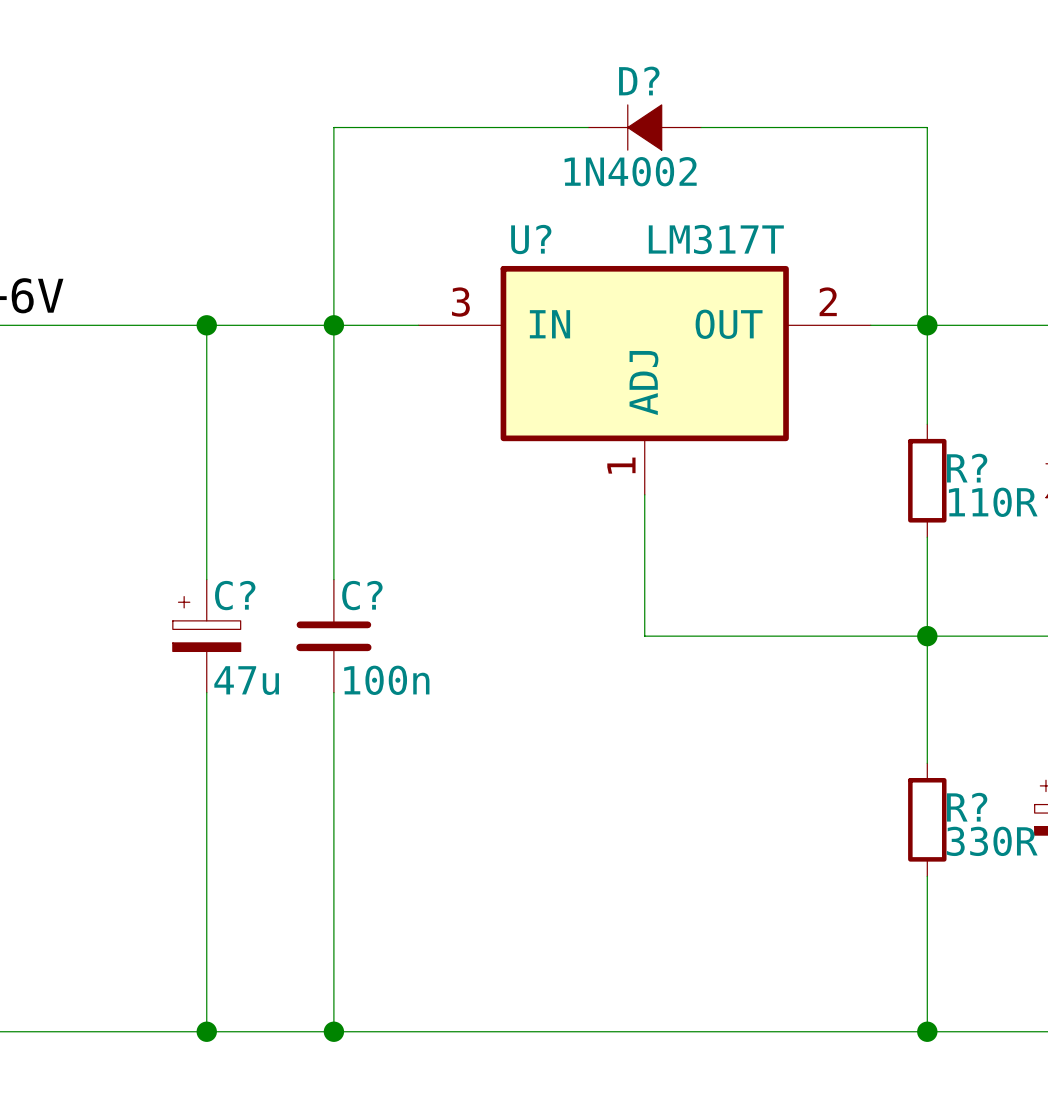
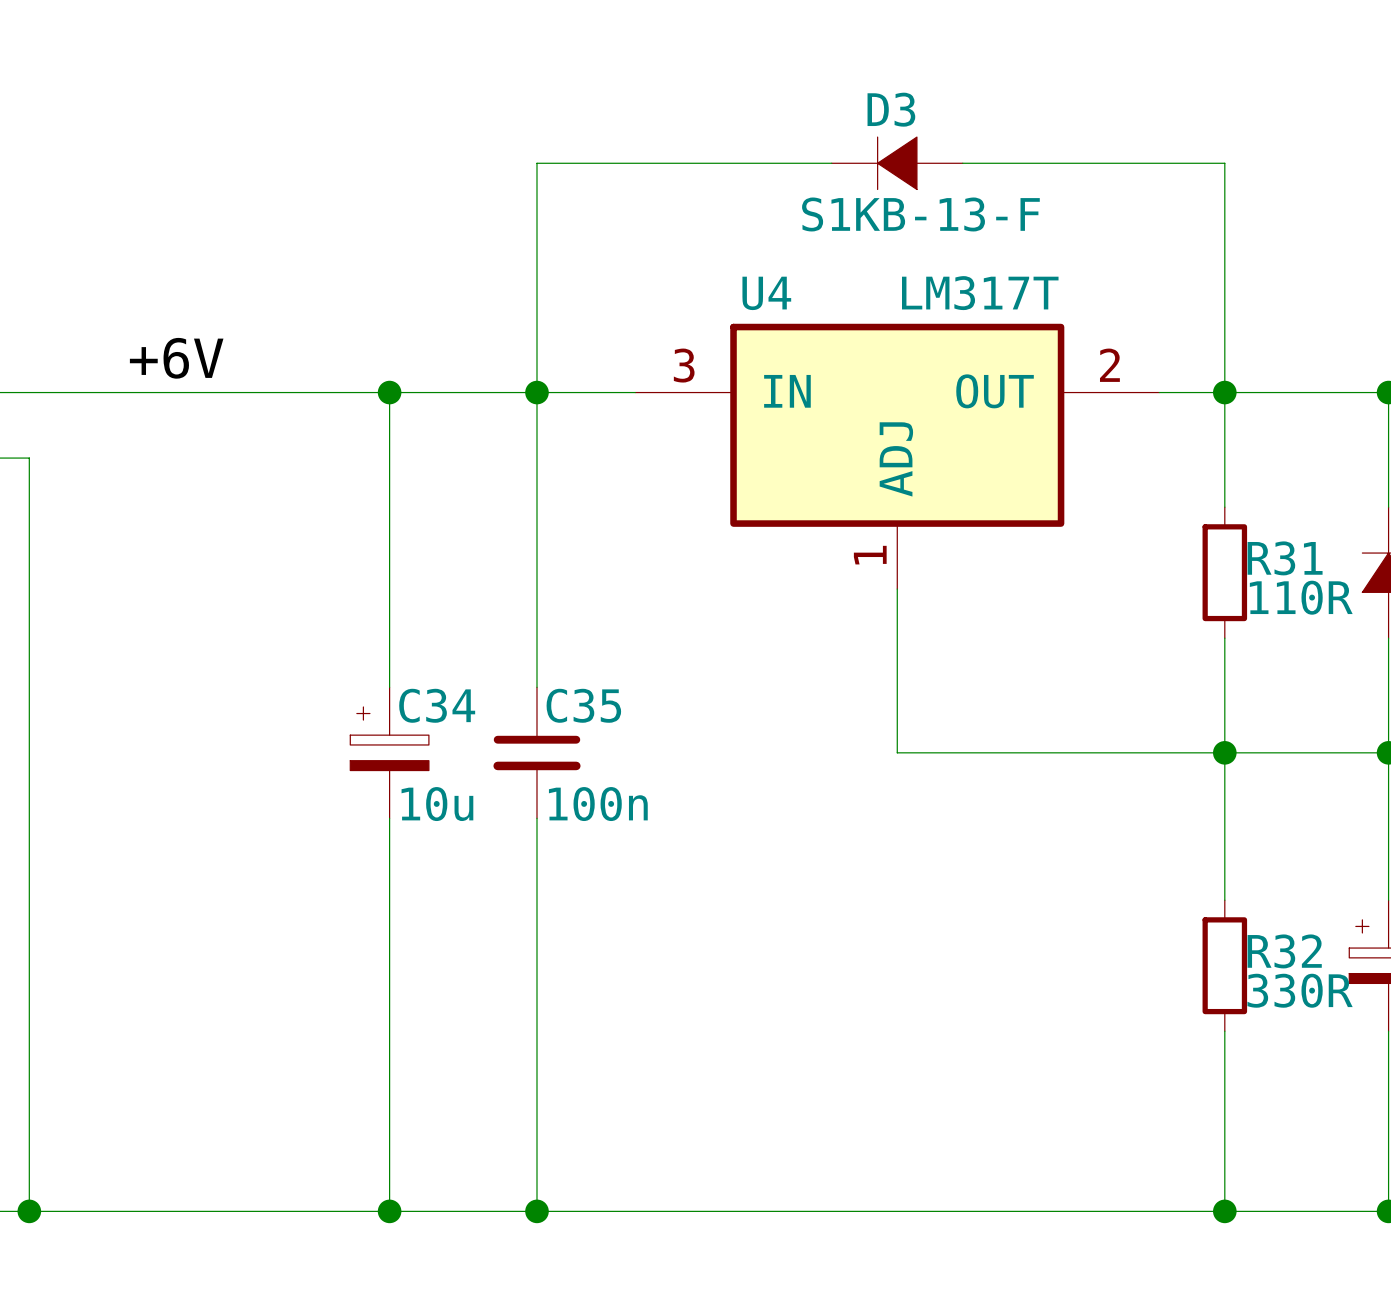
D? name: D? (639, 81) -> D3 (891, 109)
D? value: 1N4002 (630, 171) -> S1KB-13-F (920, 214)
U? name: U? (531, 239) -> U4 (766, 293)
R? name: R? (967, 468) -> R31 (1285, 558)
C? name: C? (235, 595) -> C34 (437, 705)
C? name: C? (362, 595) -> C35 (583, 705)
C? value: 47u (246, 680) -> 10u (437, 804)
R? name: R? (967, 807) -> R32 (1284, 951)

